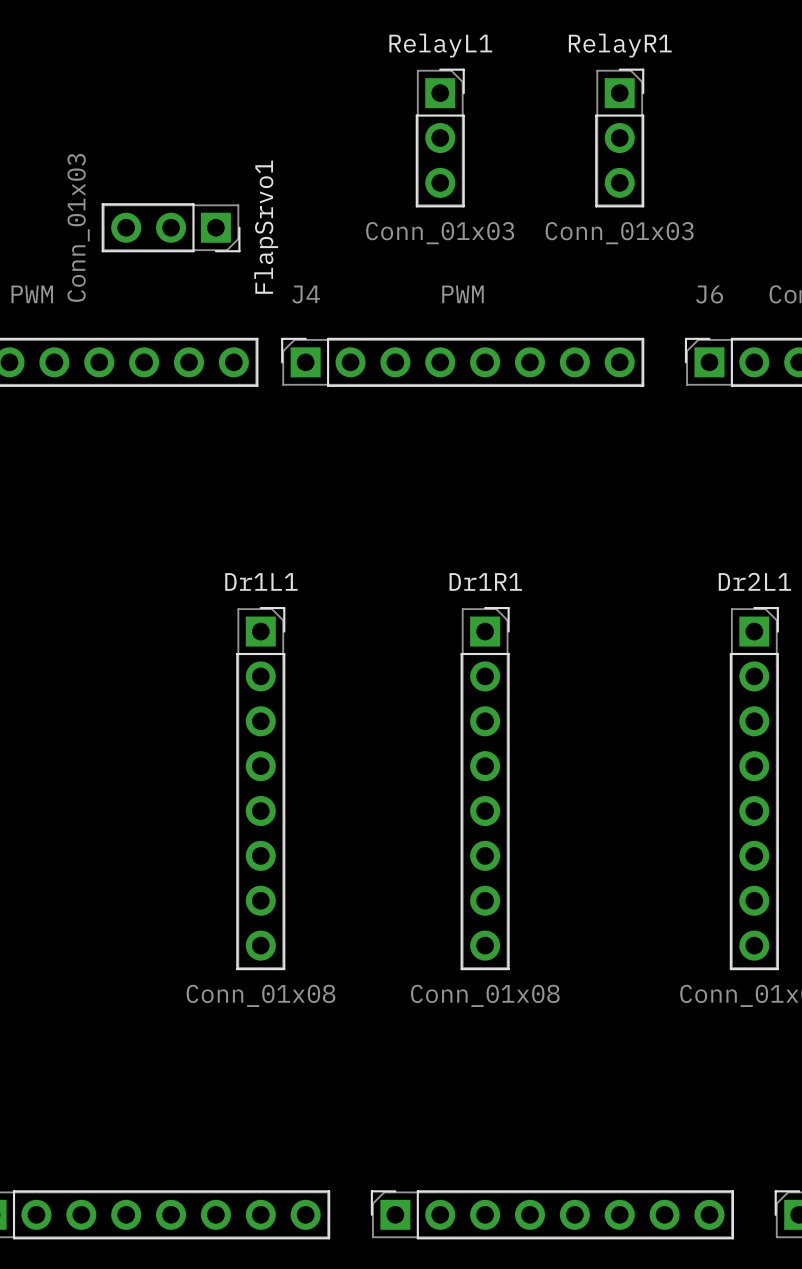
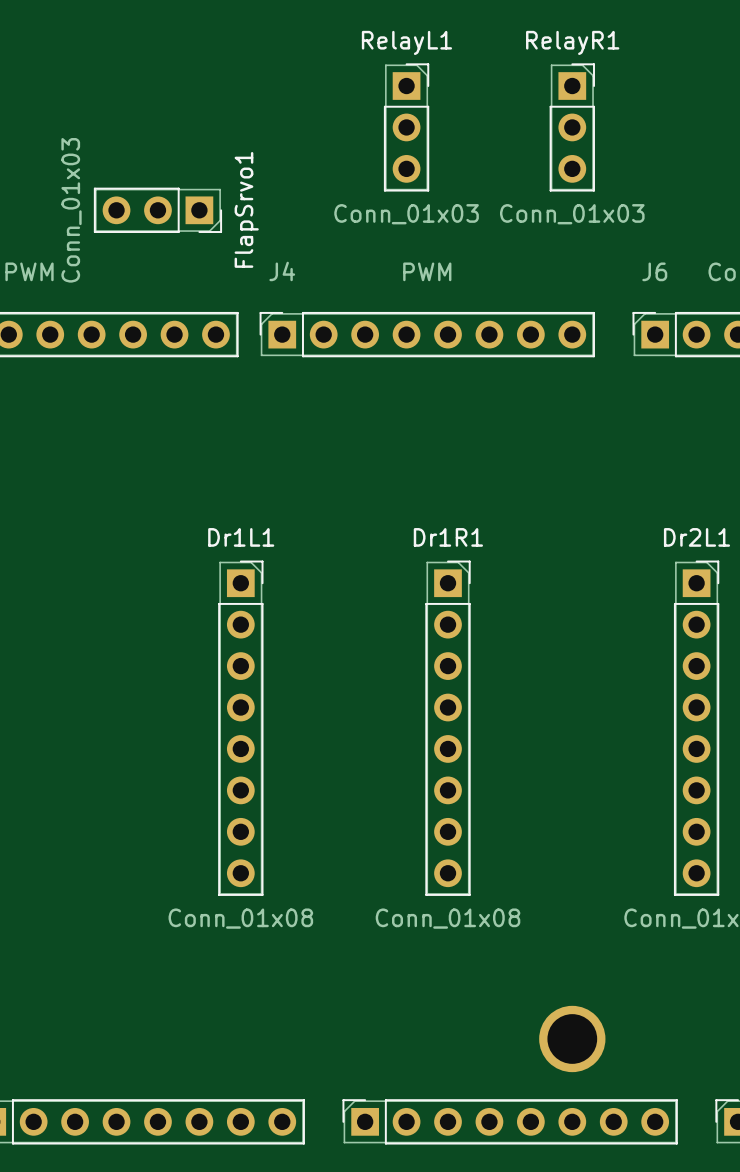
part: none -> (572, 1038)

